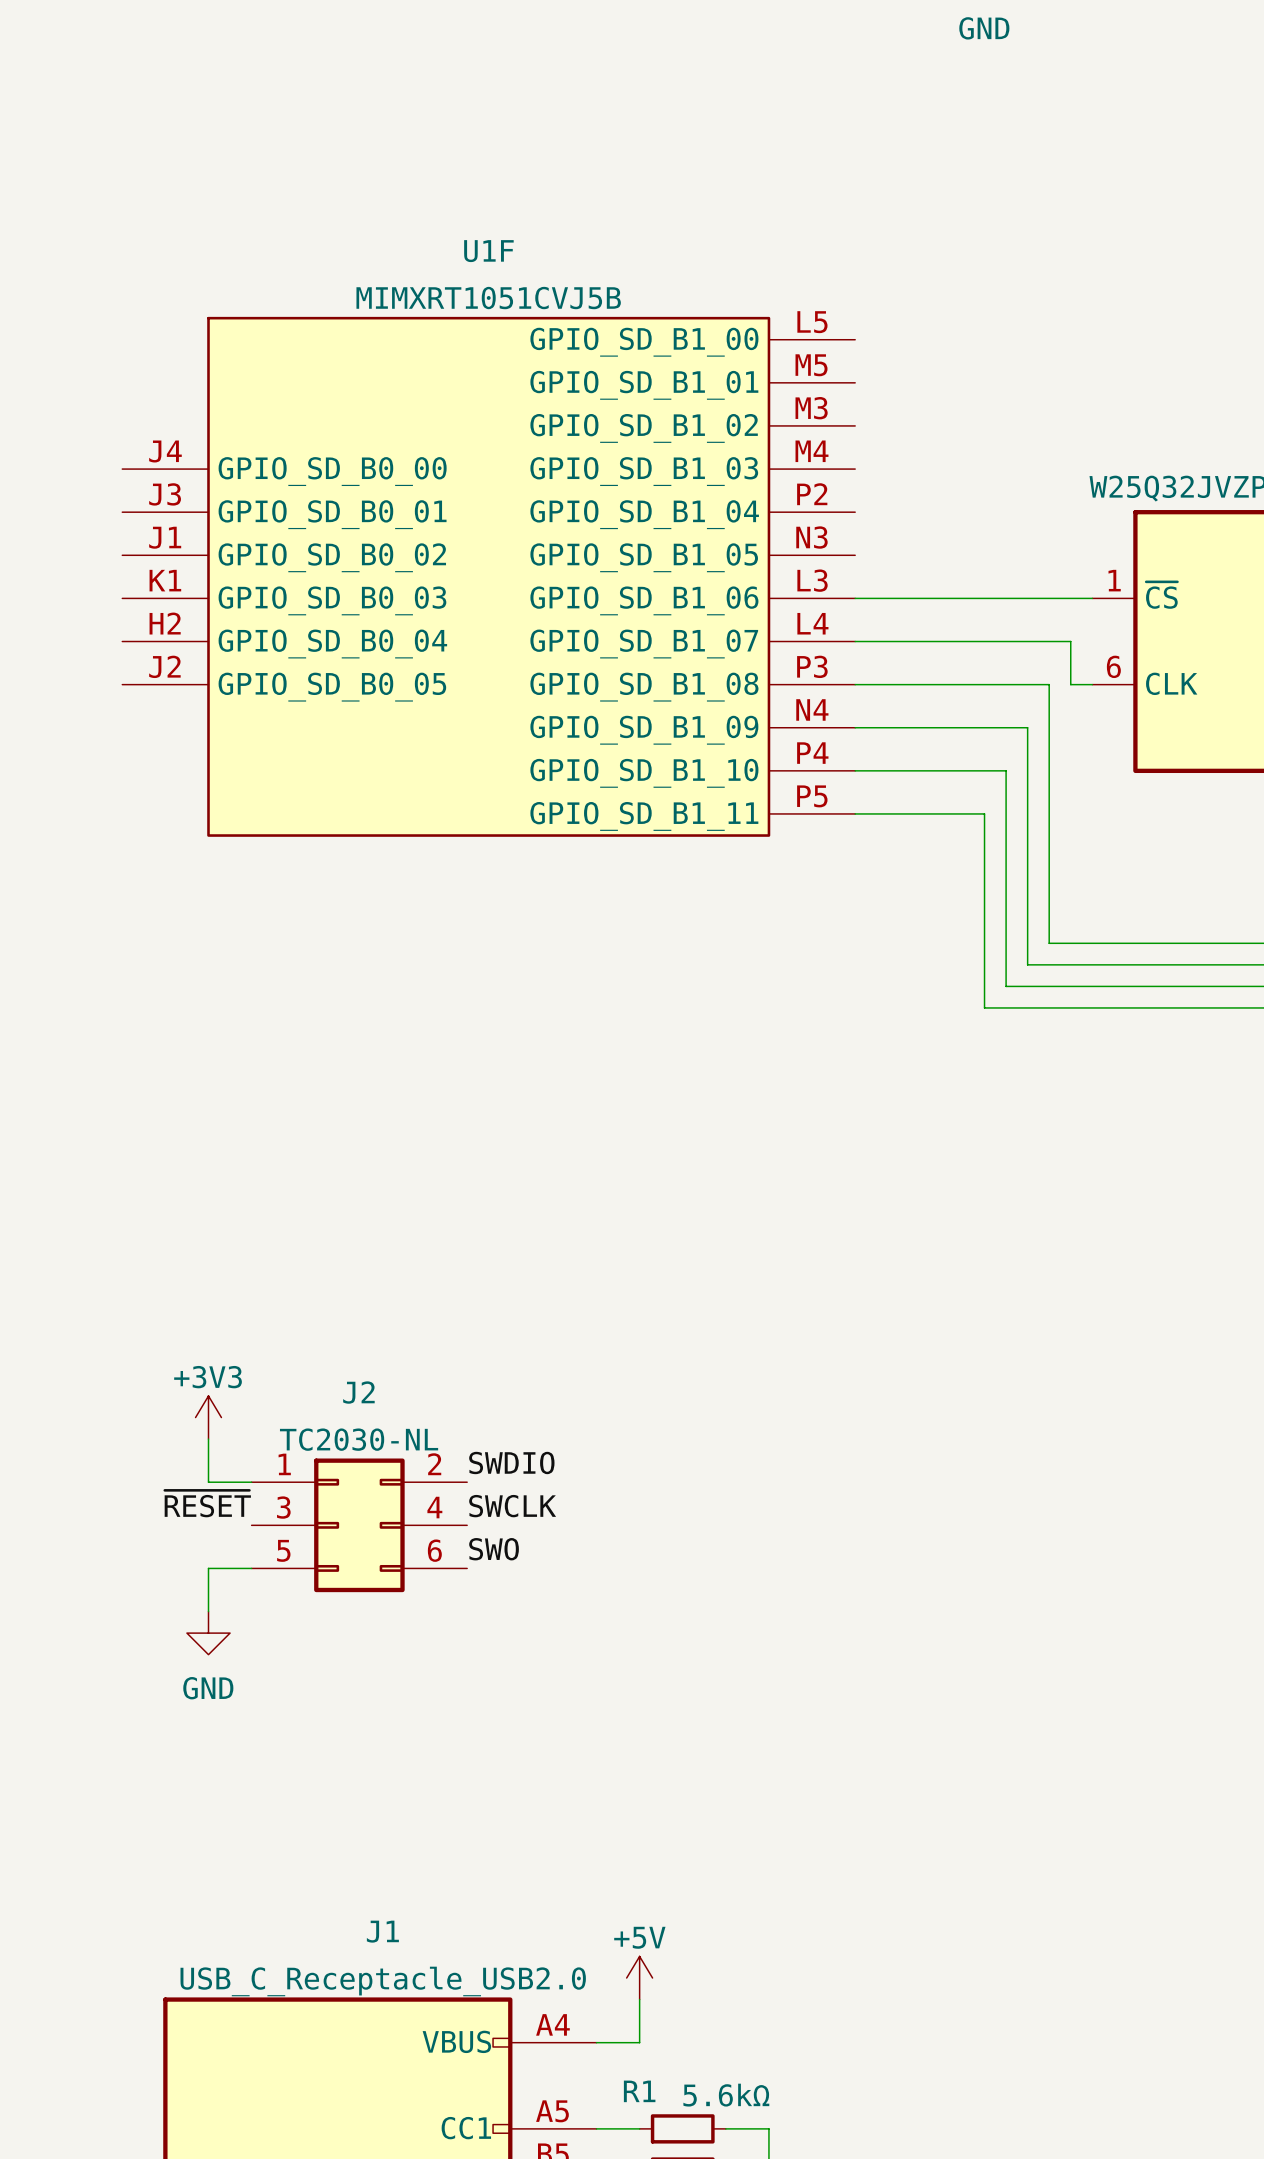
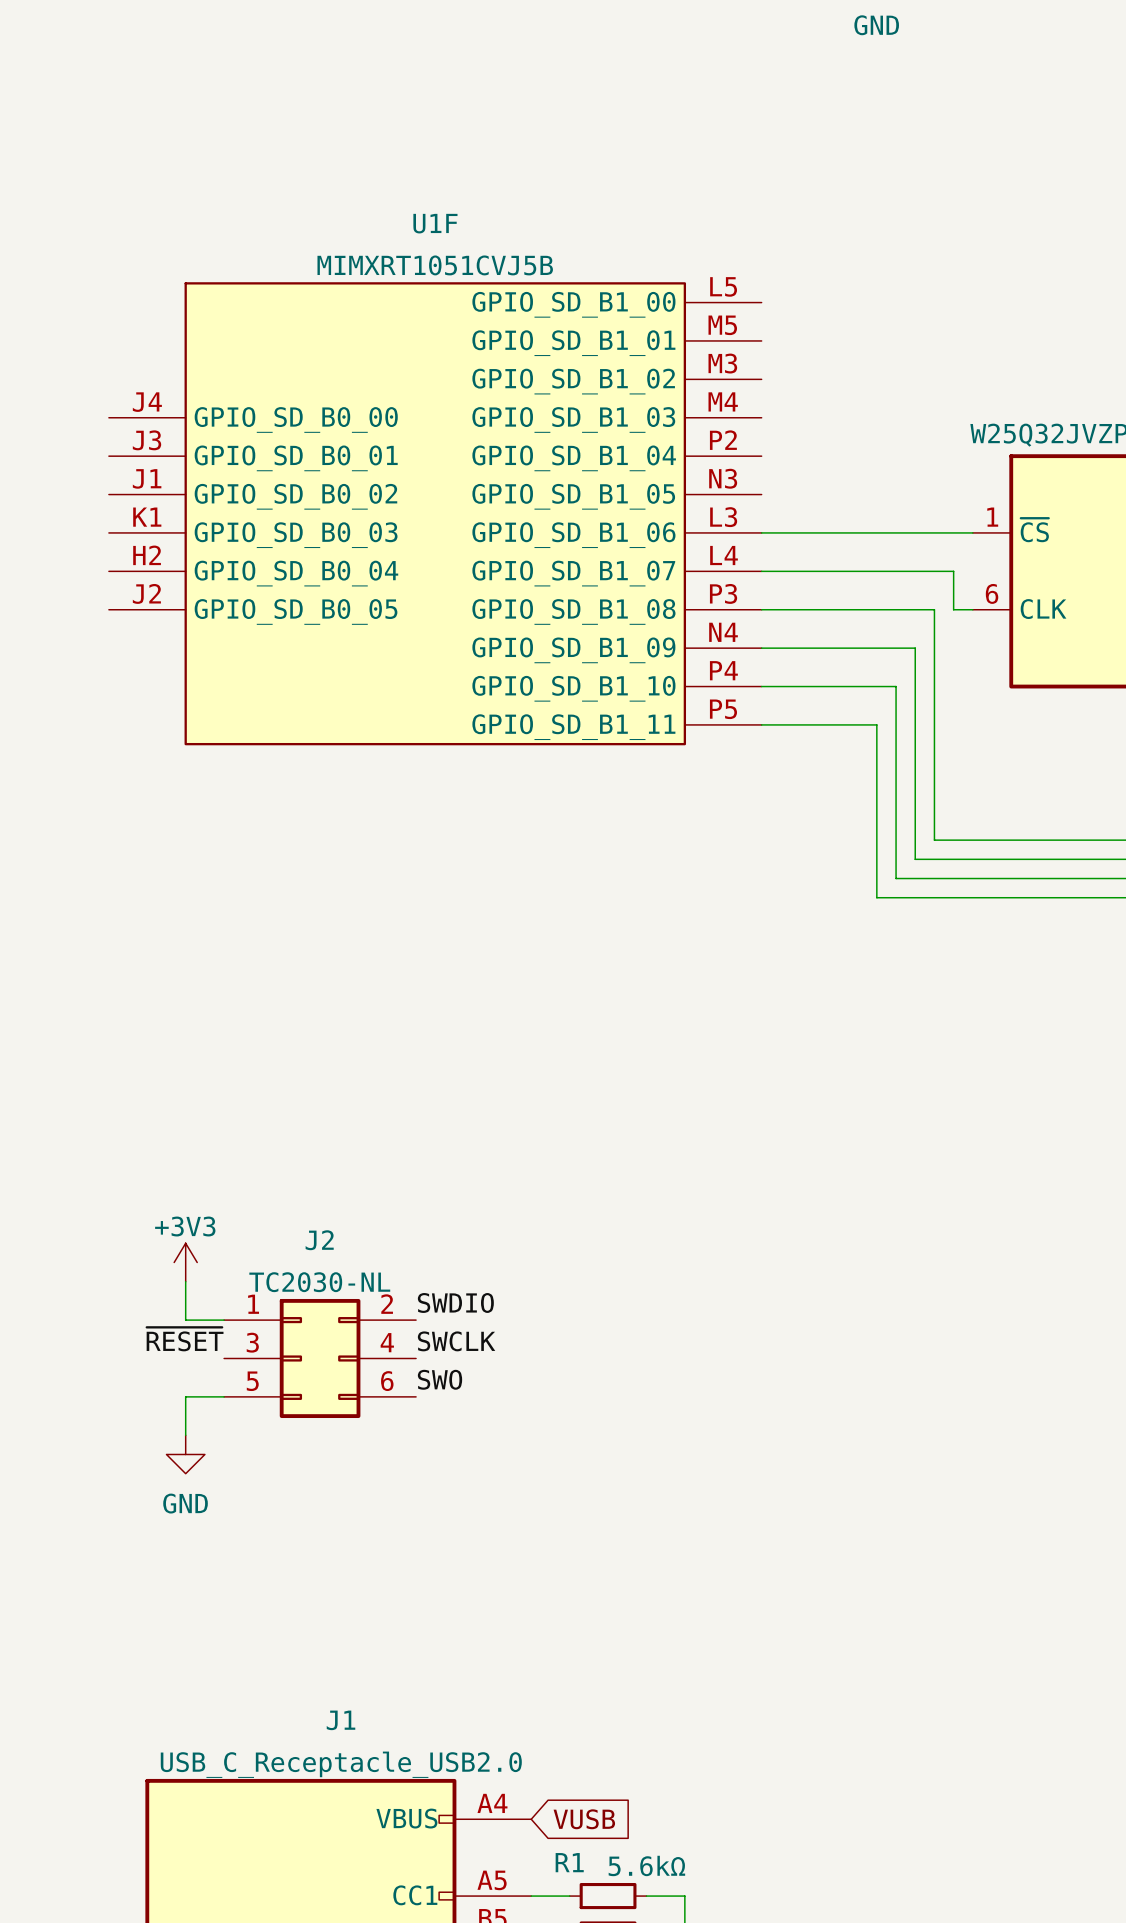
power symbol: +5V (639, 1978) -> none
wire: (639, 1999) (639, 2042) (596, 2042) -> none
global label: none -> VUSB (584, 1819)

